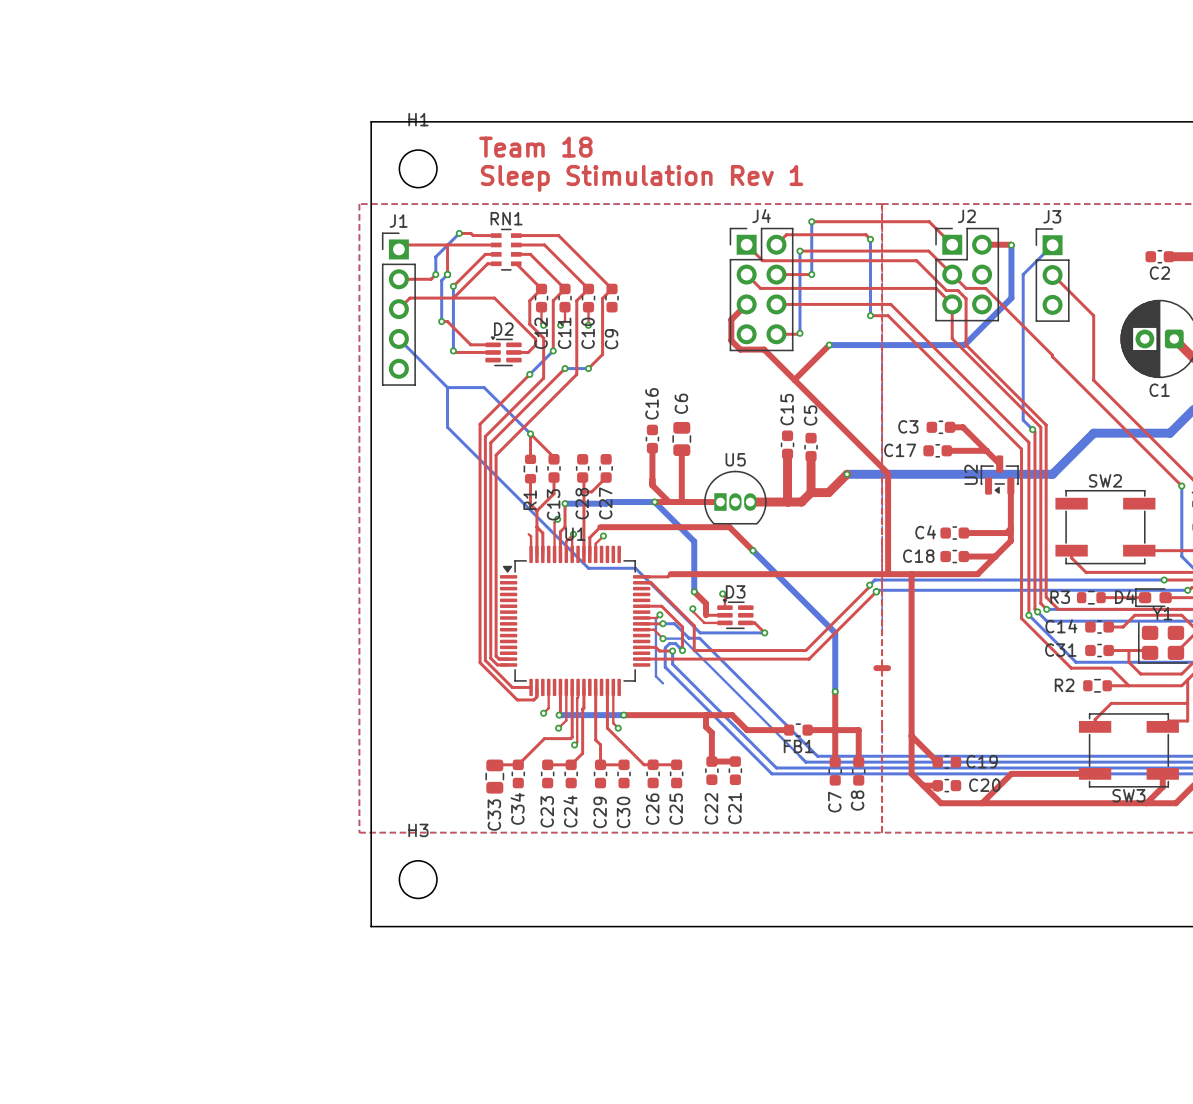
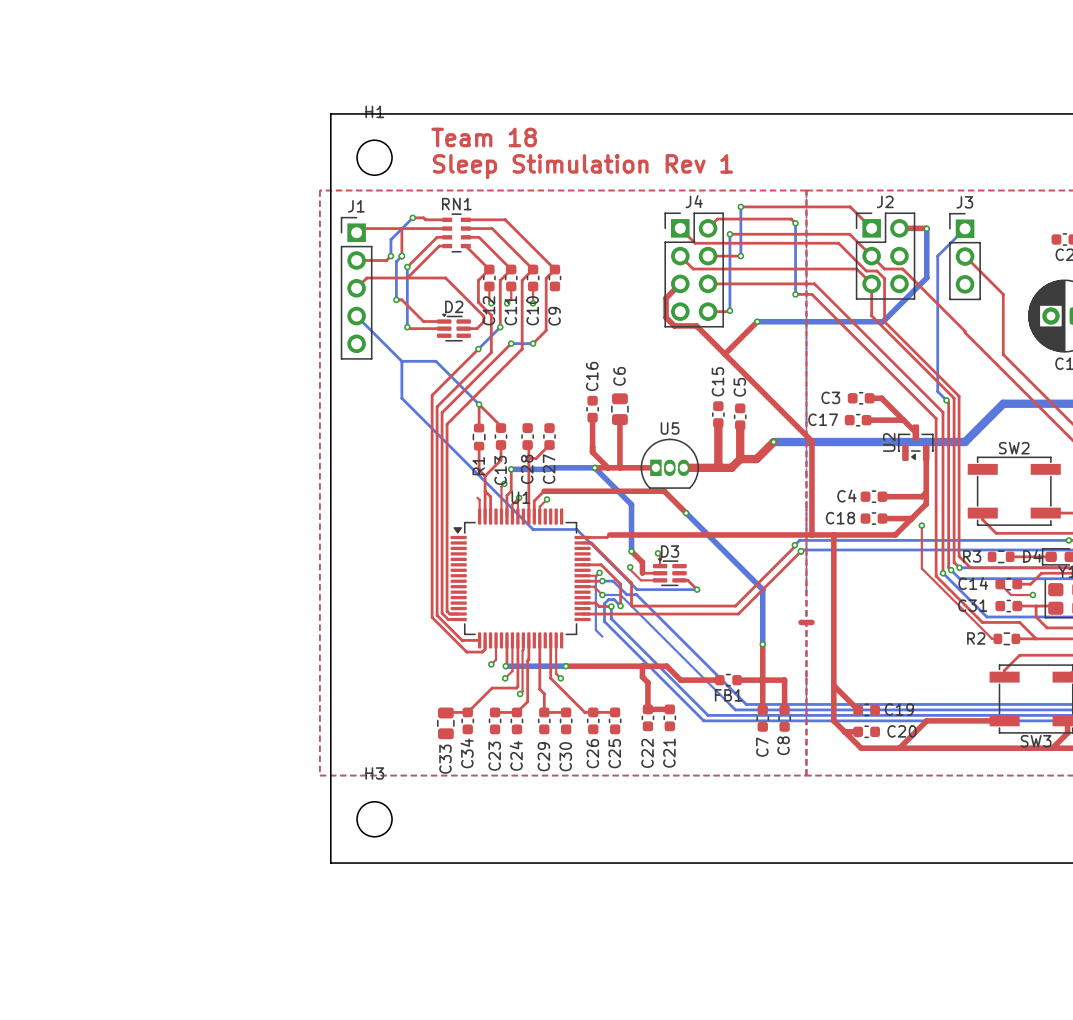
top track: none -> (921, 525) (921, 568) (992, 638) (997, 638)
via: none -> (921, 525)
top track: none -> (1000, 584) (1011, 595) (1032, 595)
via: none -> (1032, 595)

